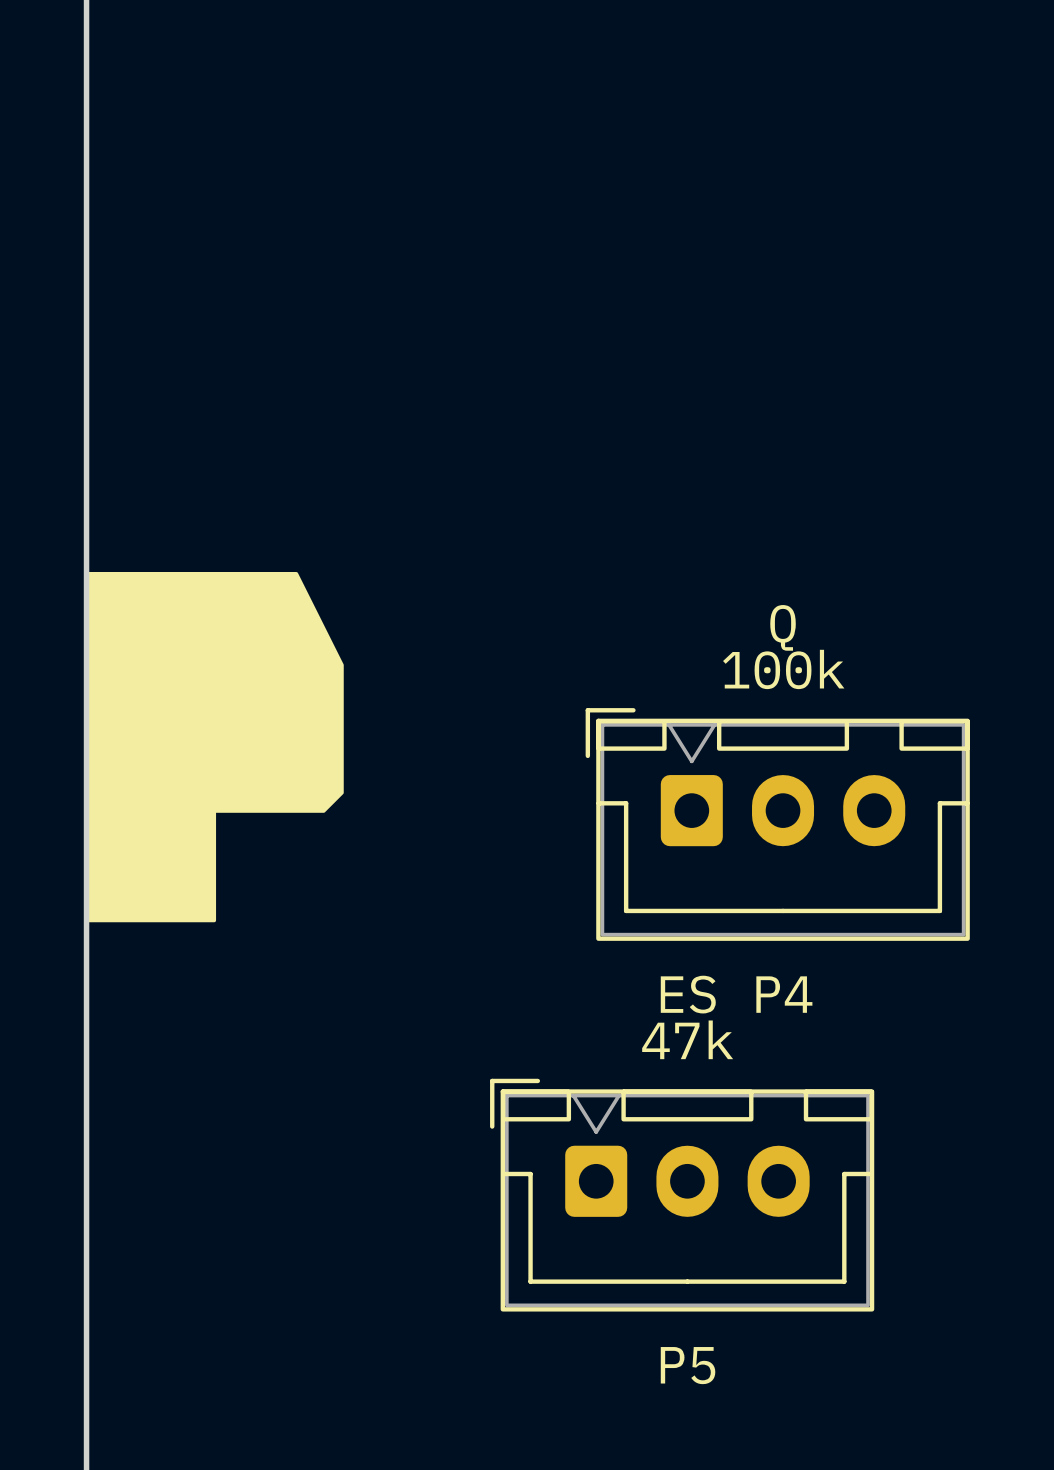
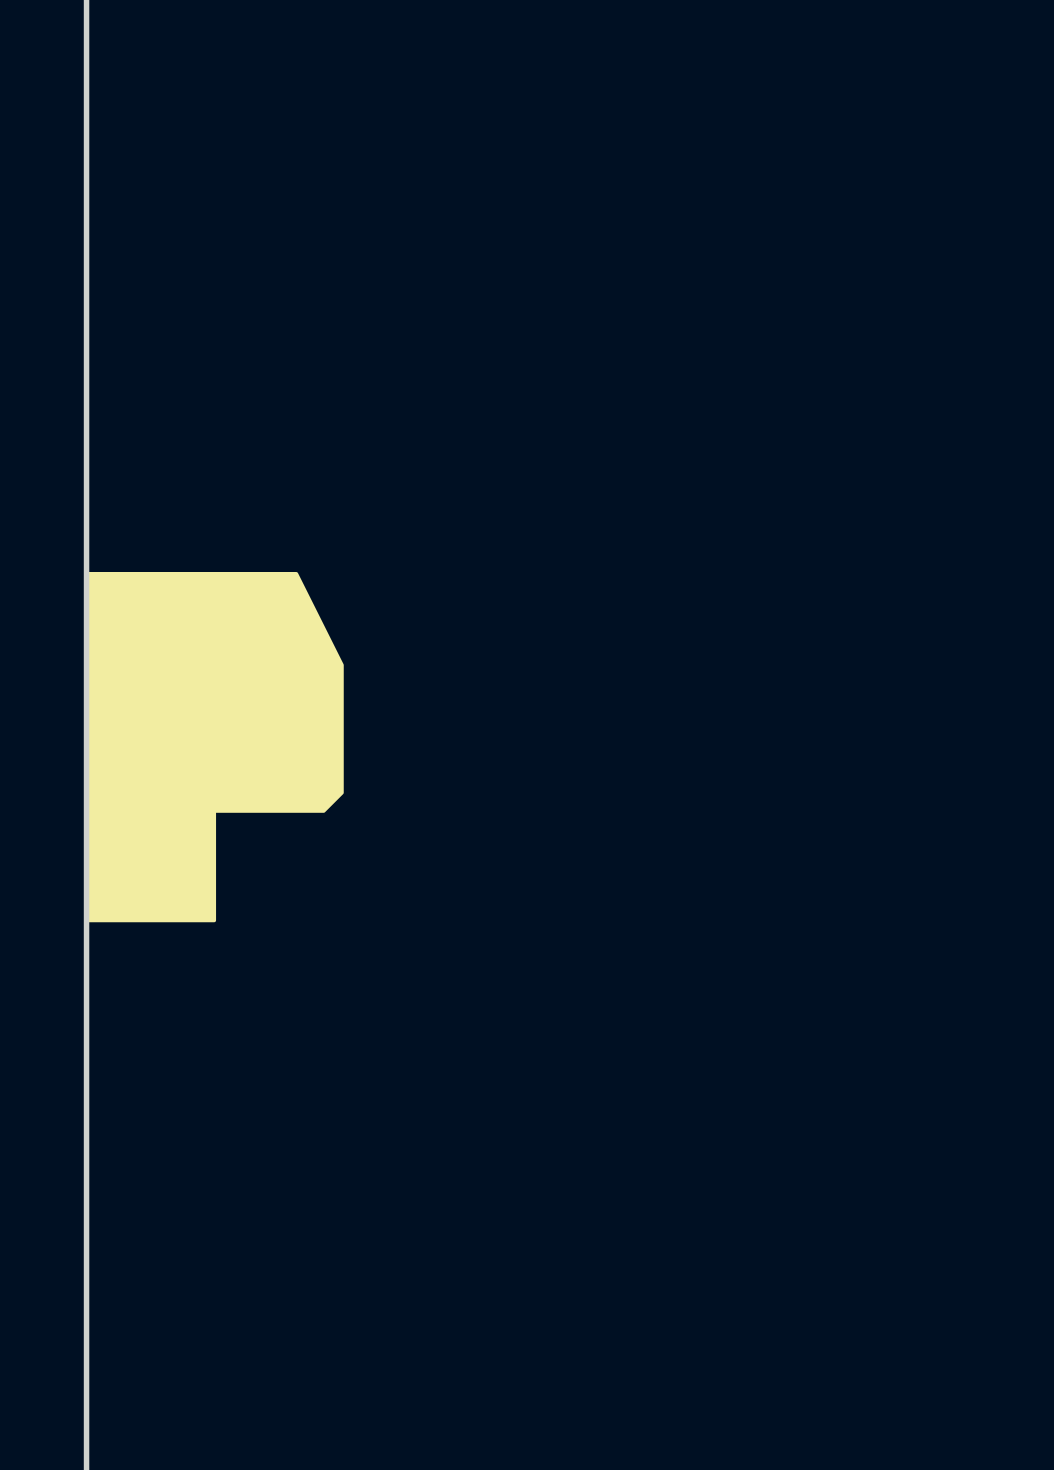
P4: 100k (777, 824) -> none
P5: 47k (682, 1195) -> none

